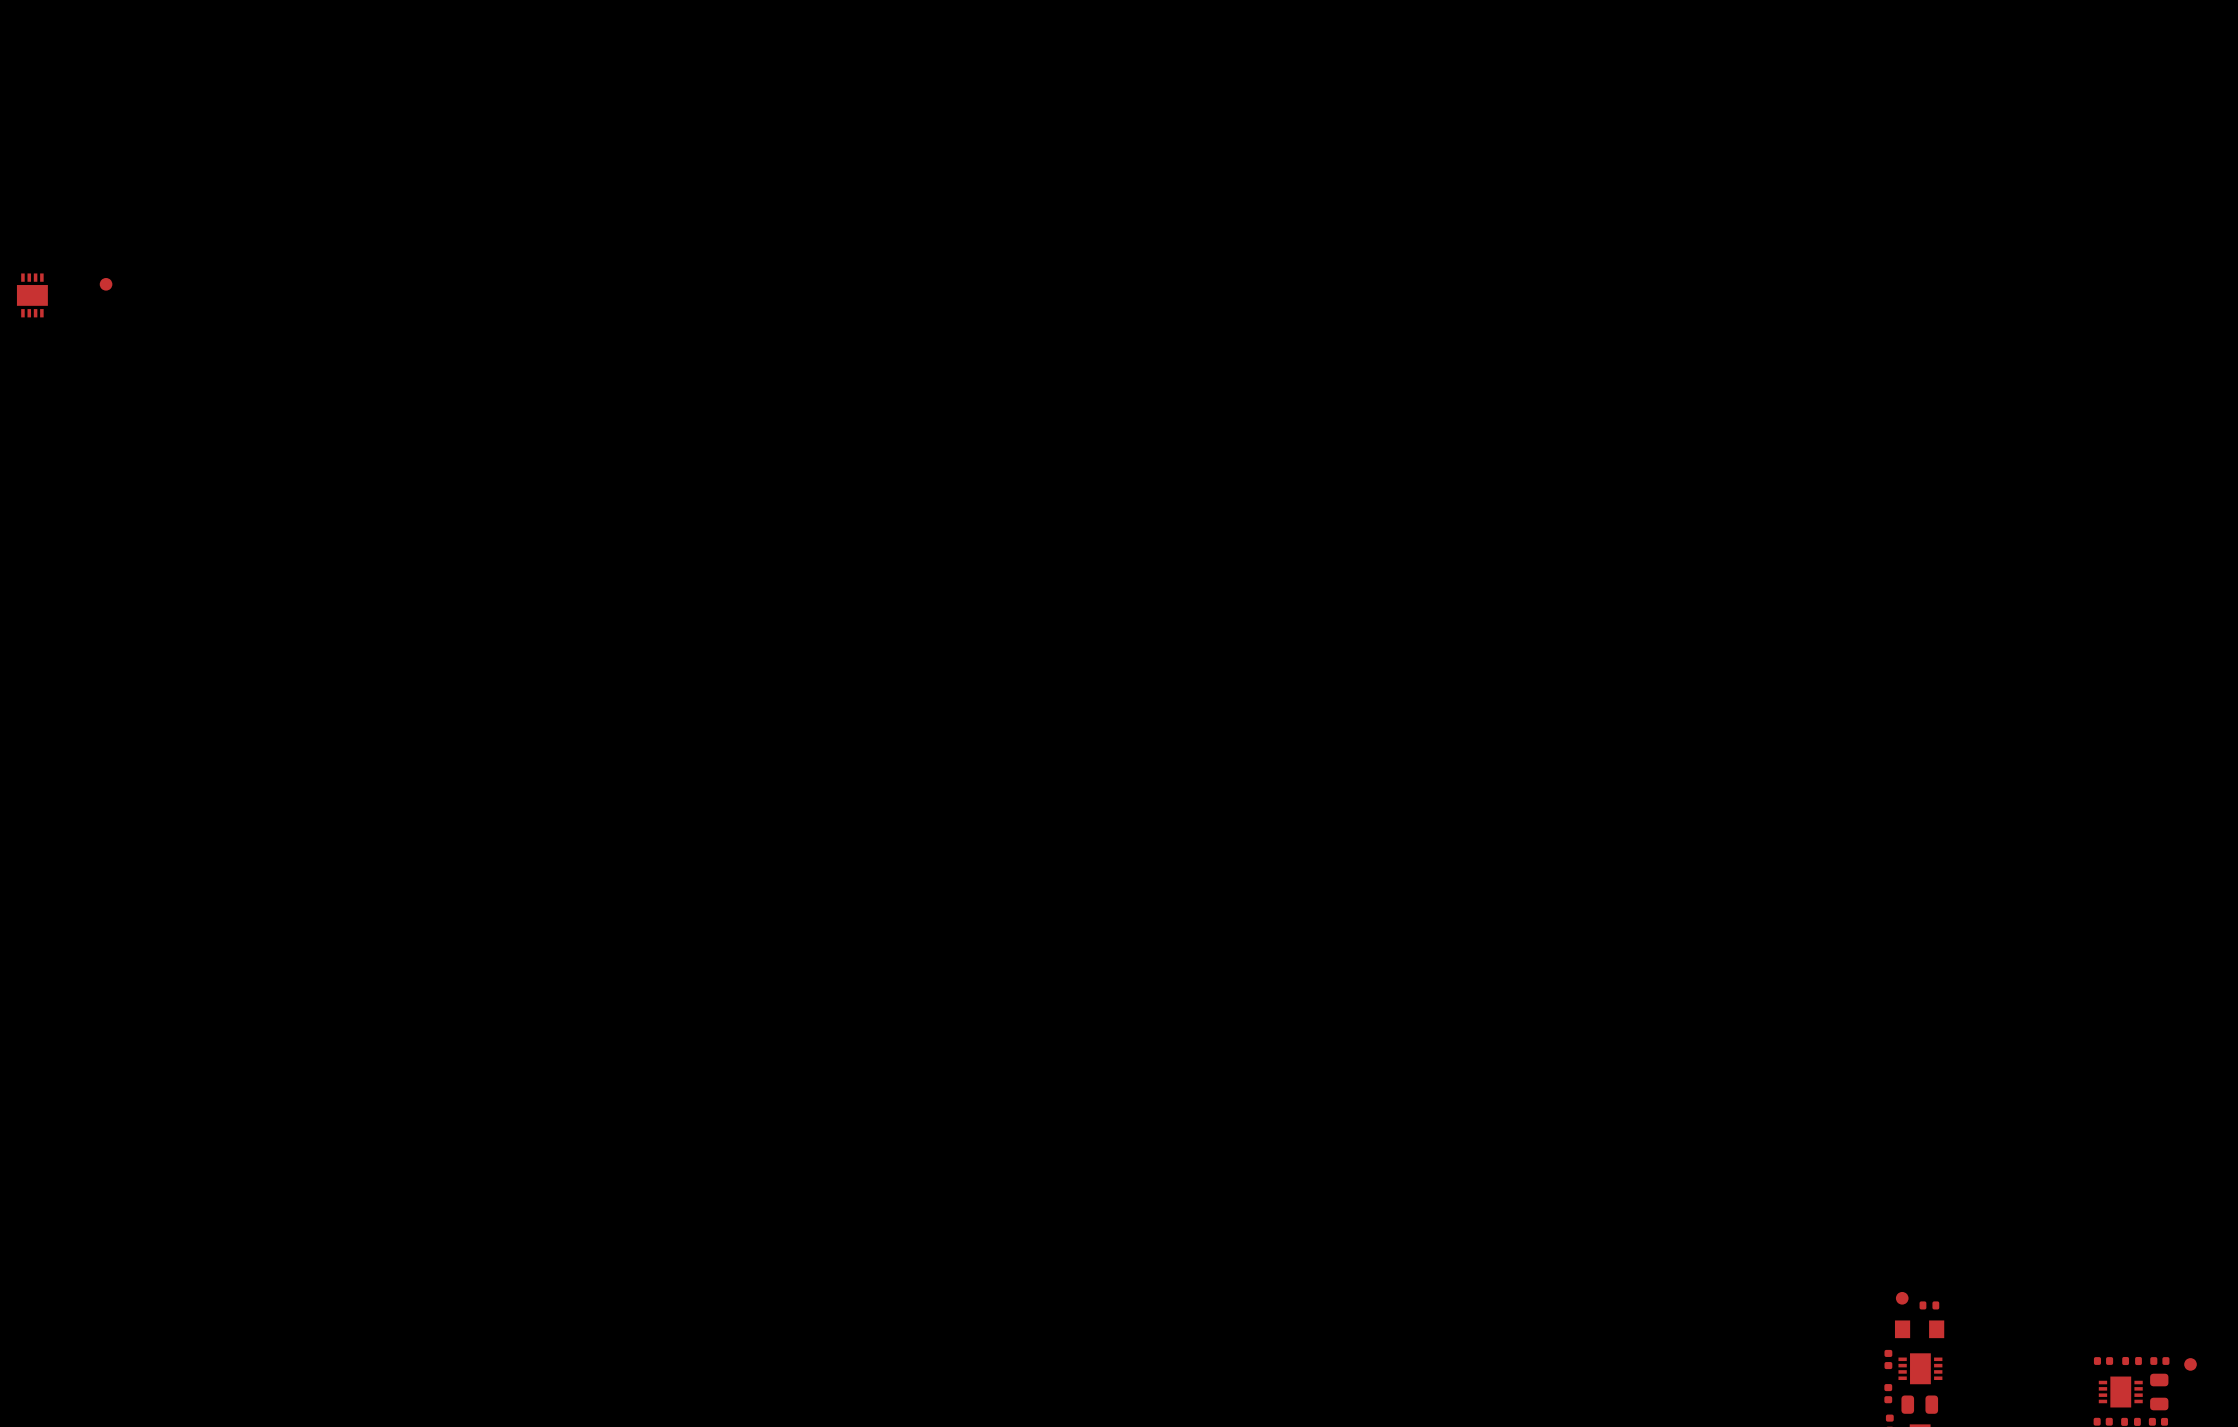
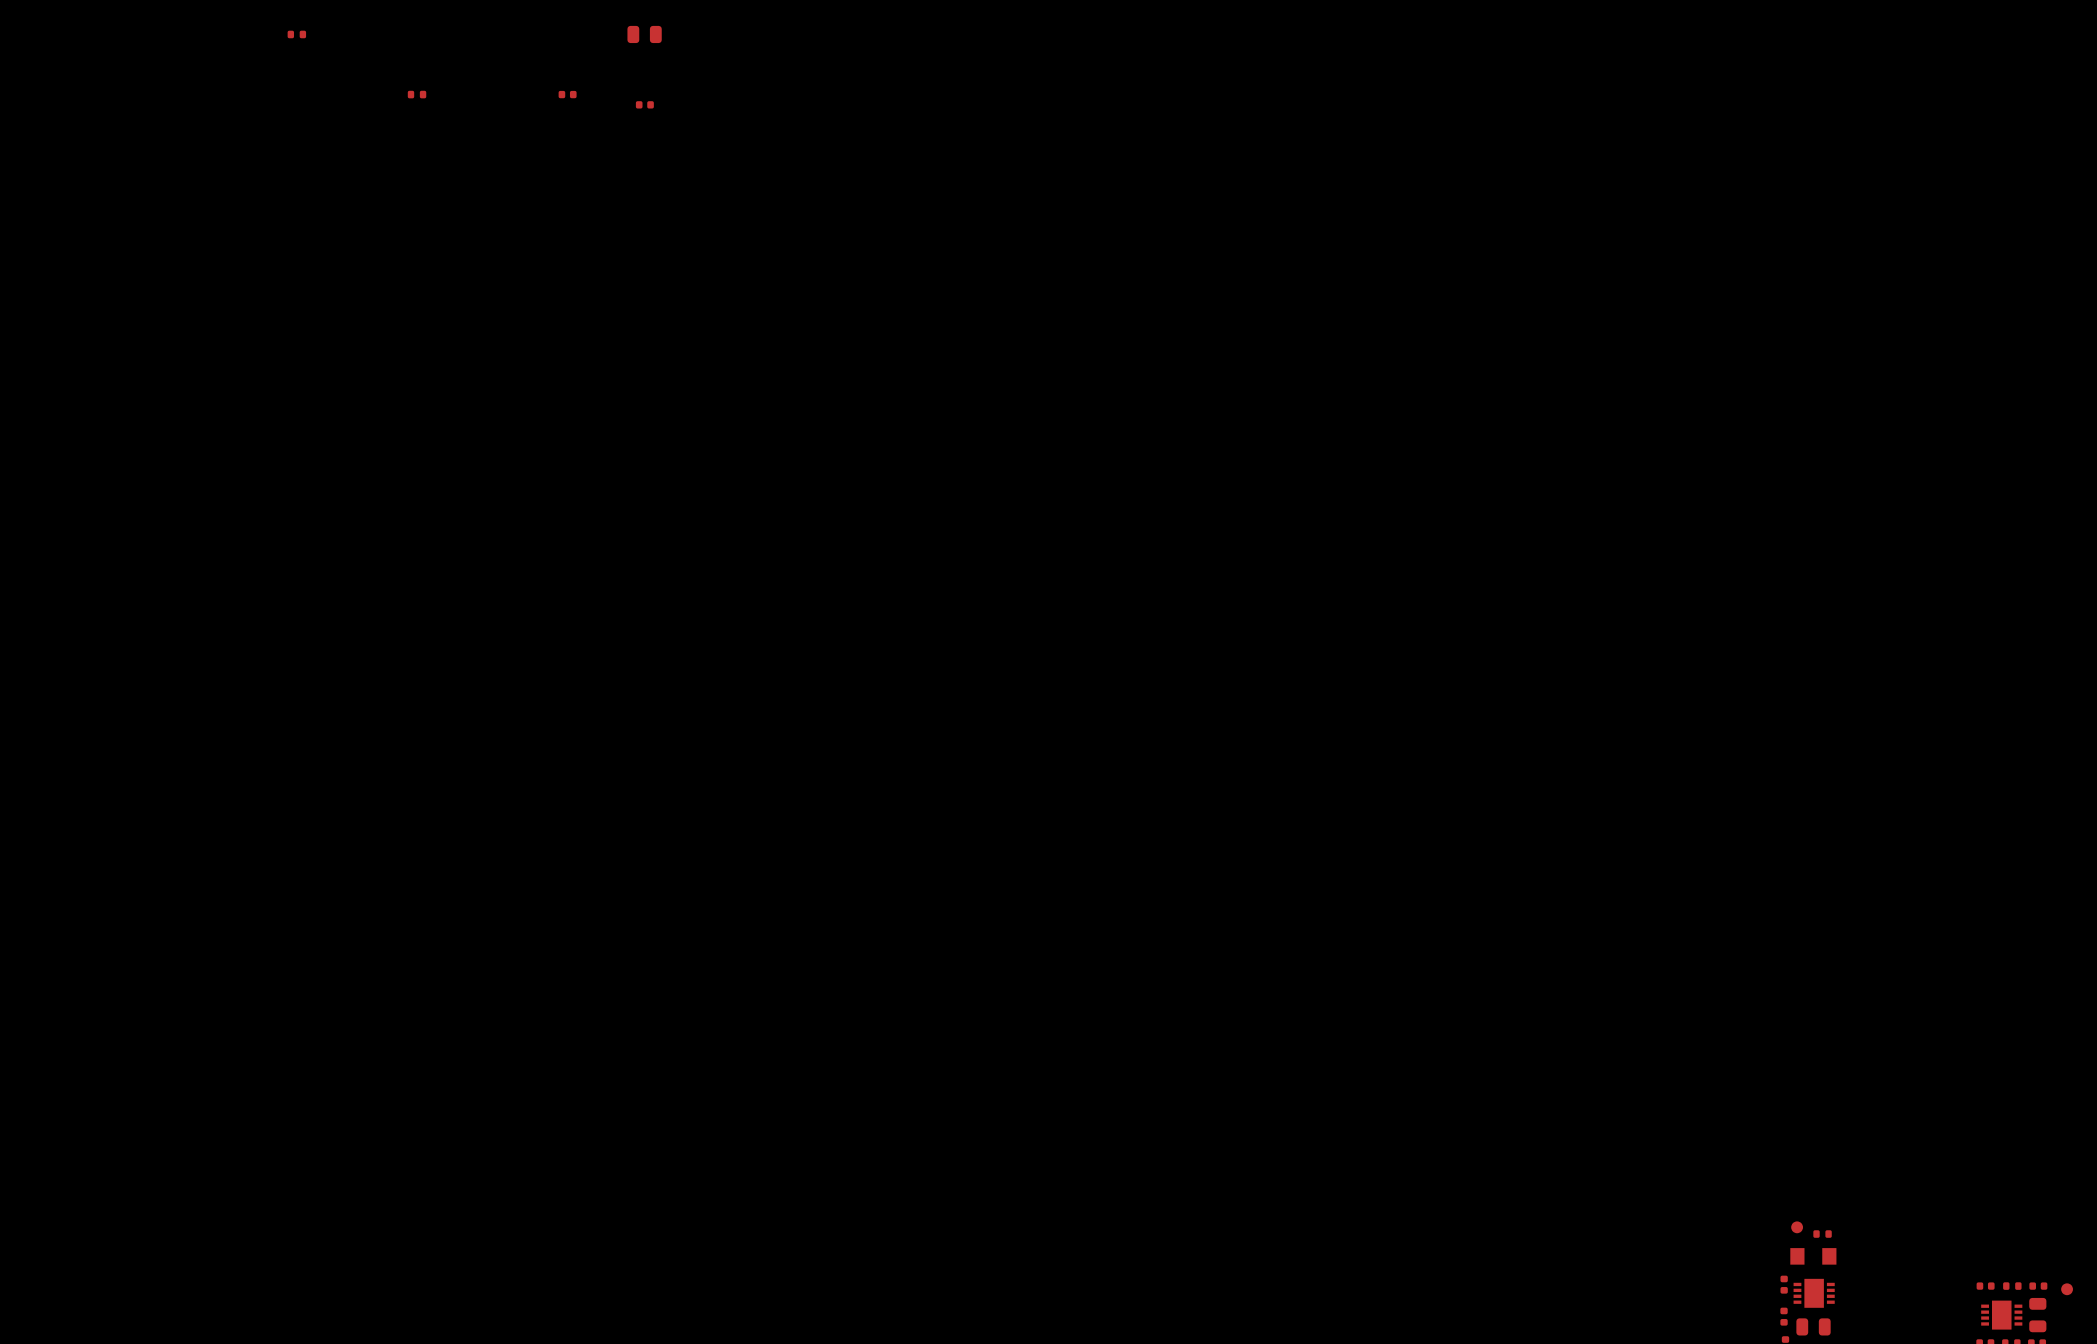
part: none -> (296, 34)
part: none -> (644, 34)
part: none -> (417, 94)
part: none -> (567, 94)
part: none -> (644, 104)
part: (106, 284) -> none
part: (32, 295) -> none

